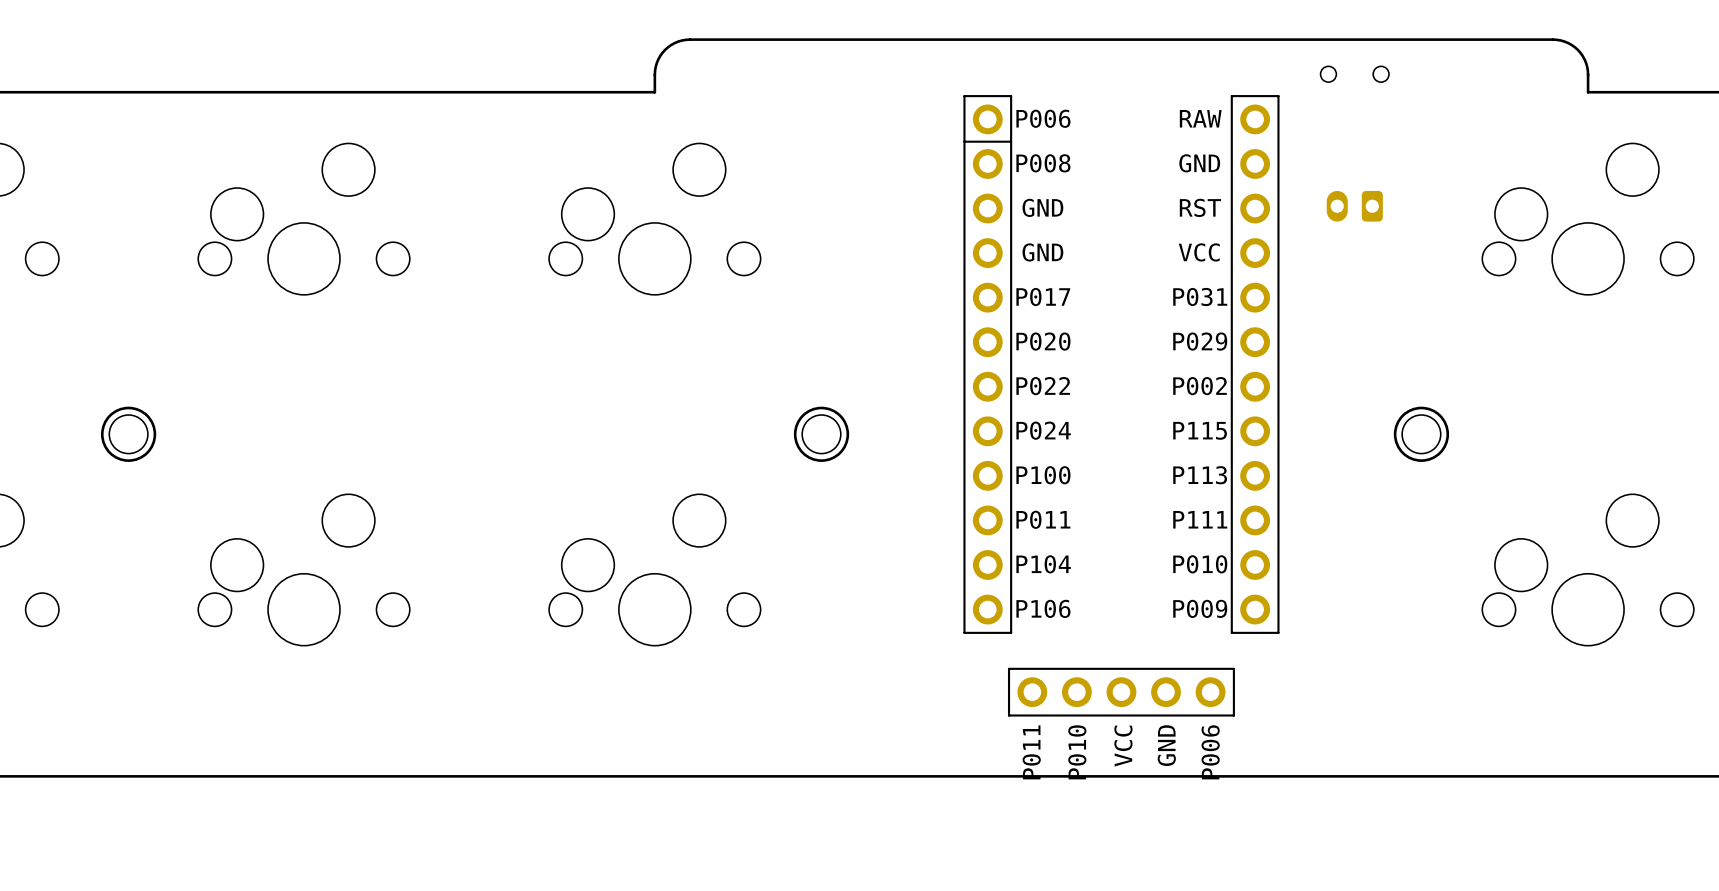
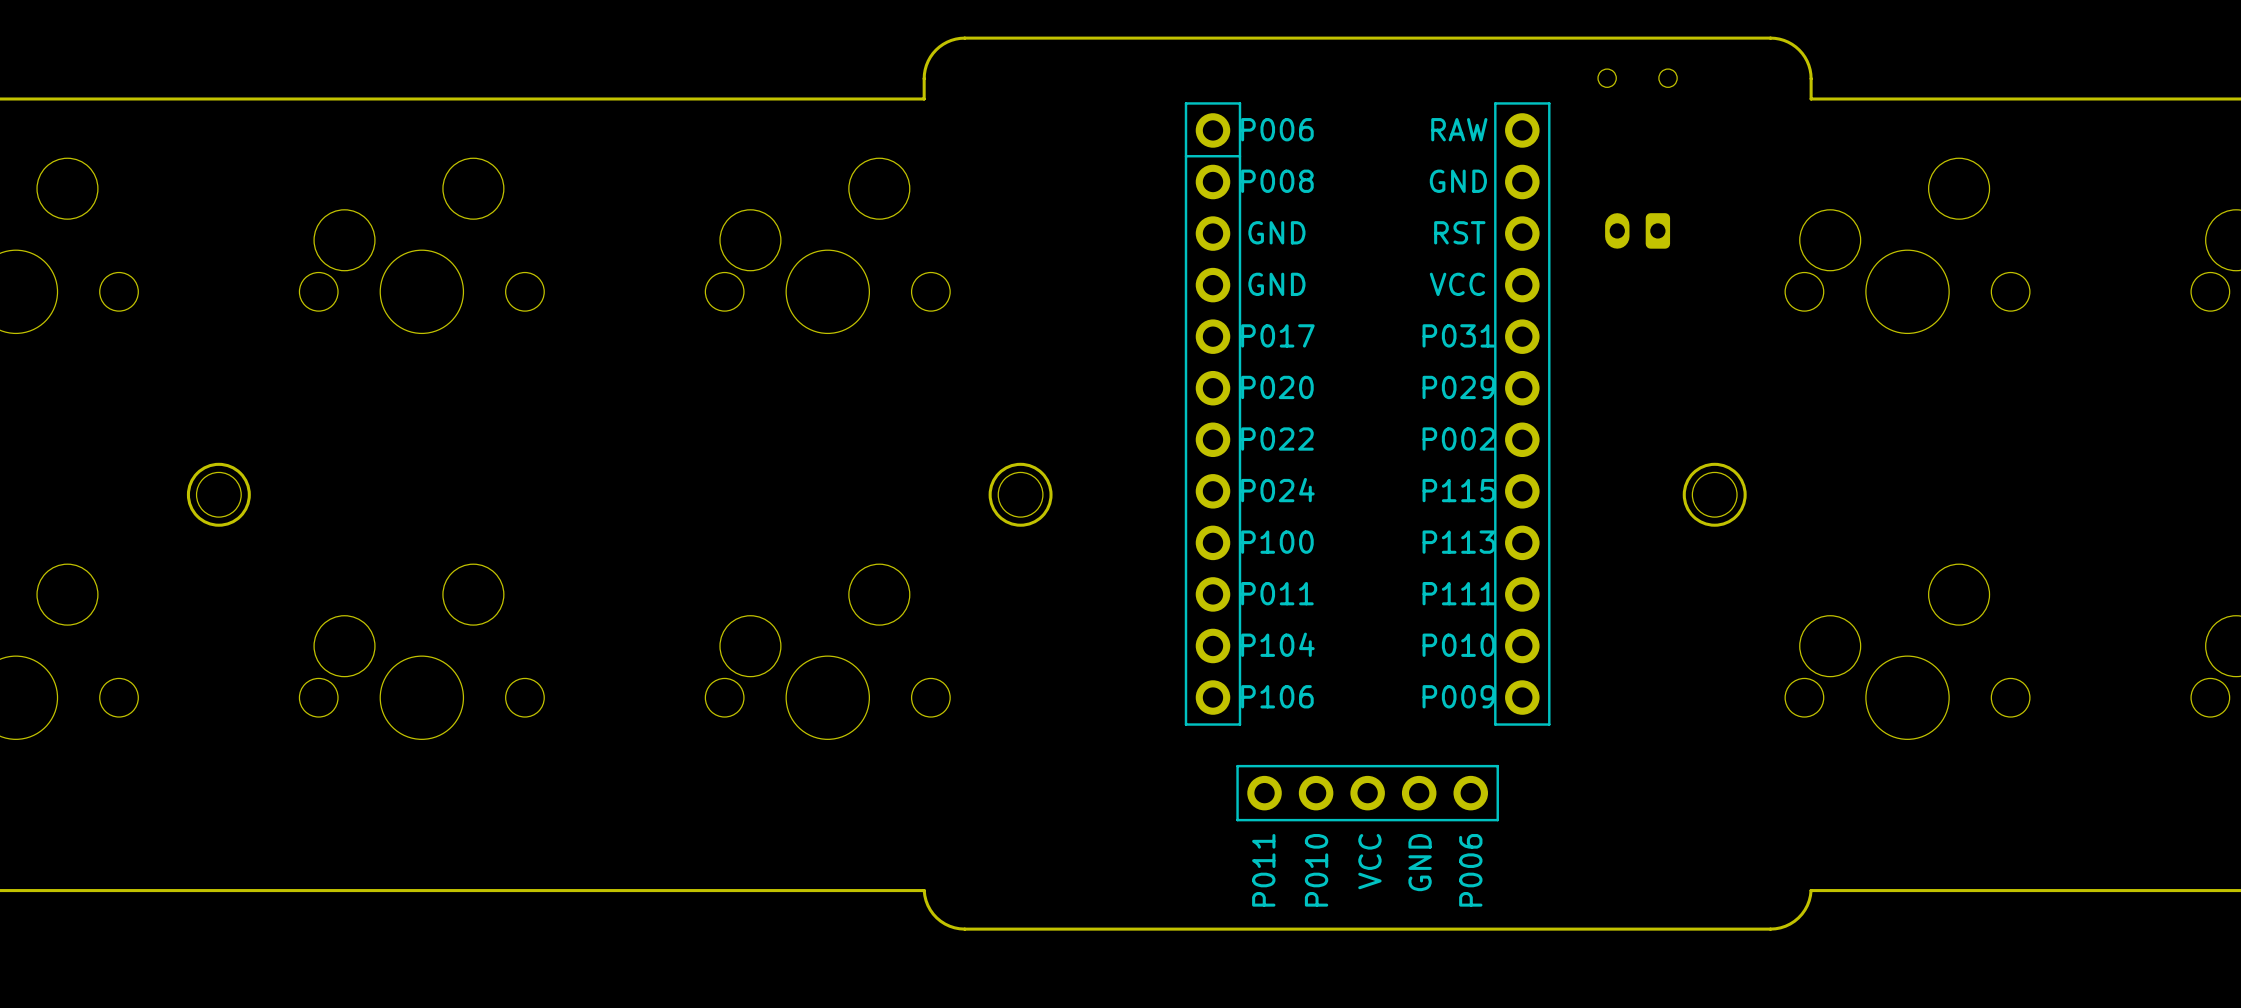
board edge: (773, 39) (689, 39) (674, 43) (662, 52) (656, 63) (654, 92) -> (964, 38) (951, 40) (943, 44) (930, 57) (924, 74) (924, 98) (827, 98)
board edge: (1469, 39) (1553, 39) (1568, 43) (1580, 52) (1586, 63) (1588, 92) -> (1770, 38) (1783, 40) (1792, 44) (1804, 57) (1810, 74) (1811, 98) (1907, 98)
board edge: (738, 776) (1504, 776) -> (924, 890) (927, 905) (936, 917) (949, 926) (964, 929) (1770, 929) (1785, 926) (1798, 917) (1807, 905) (1811, 890)

